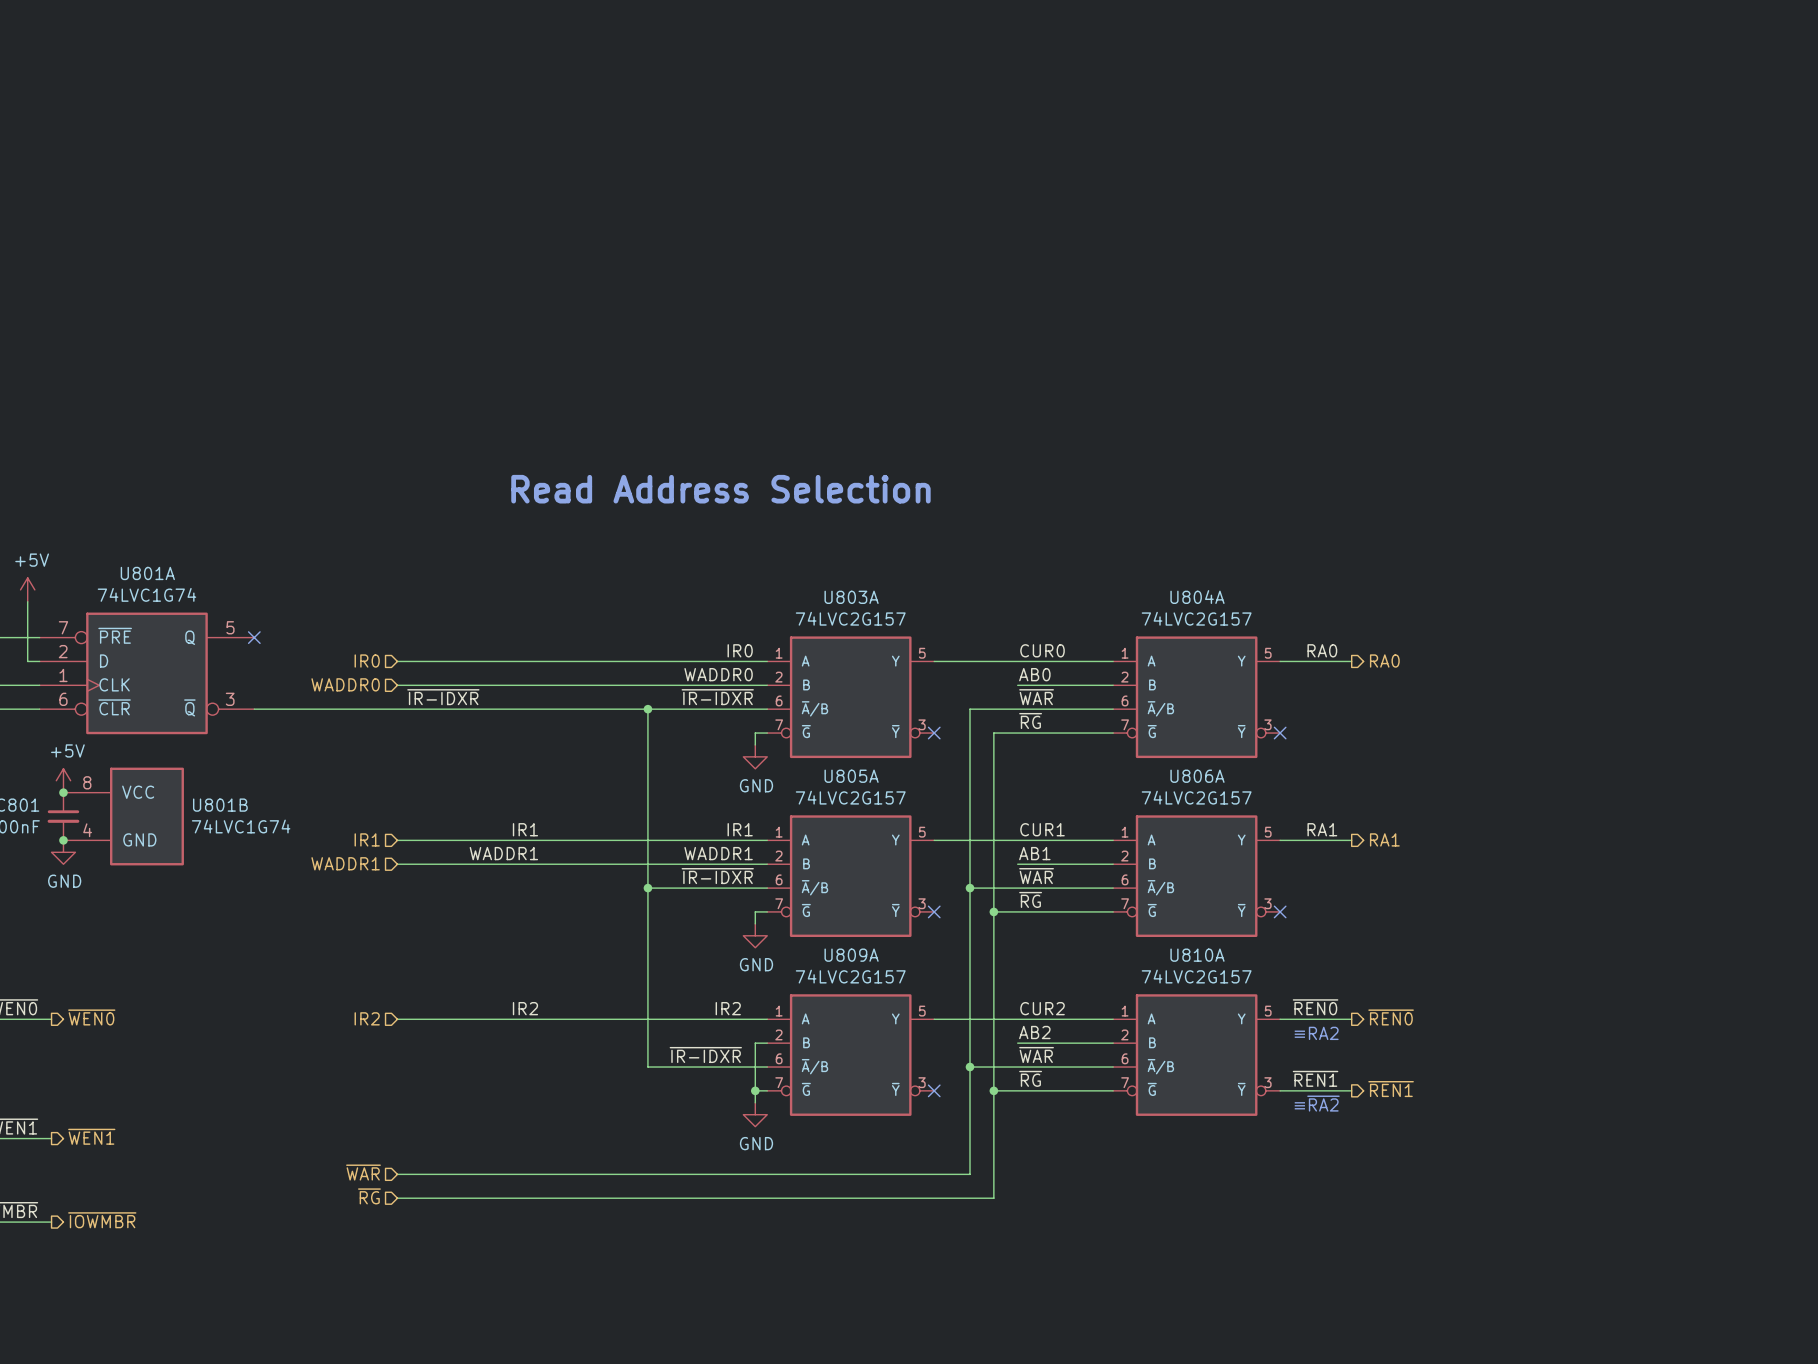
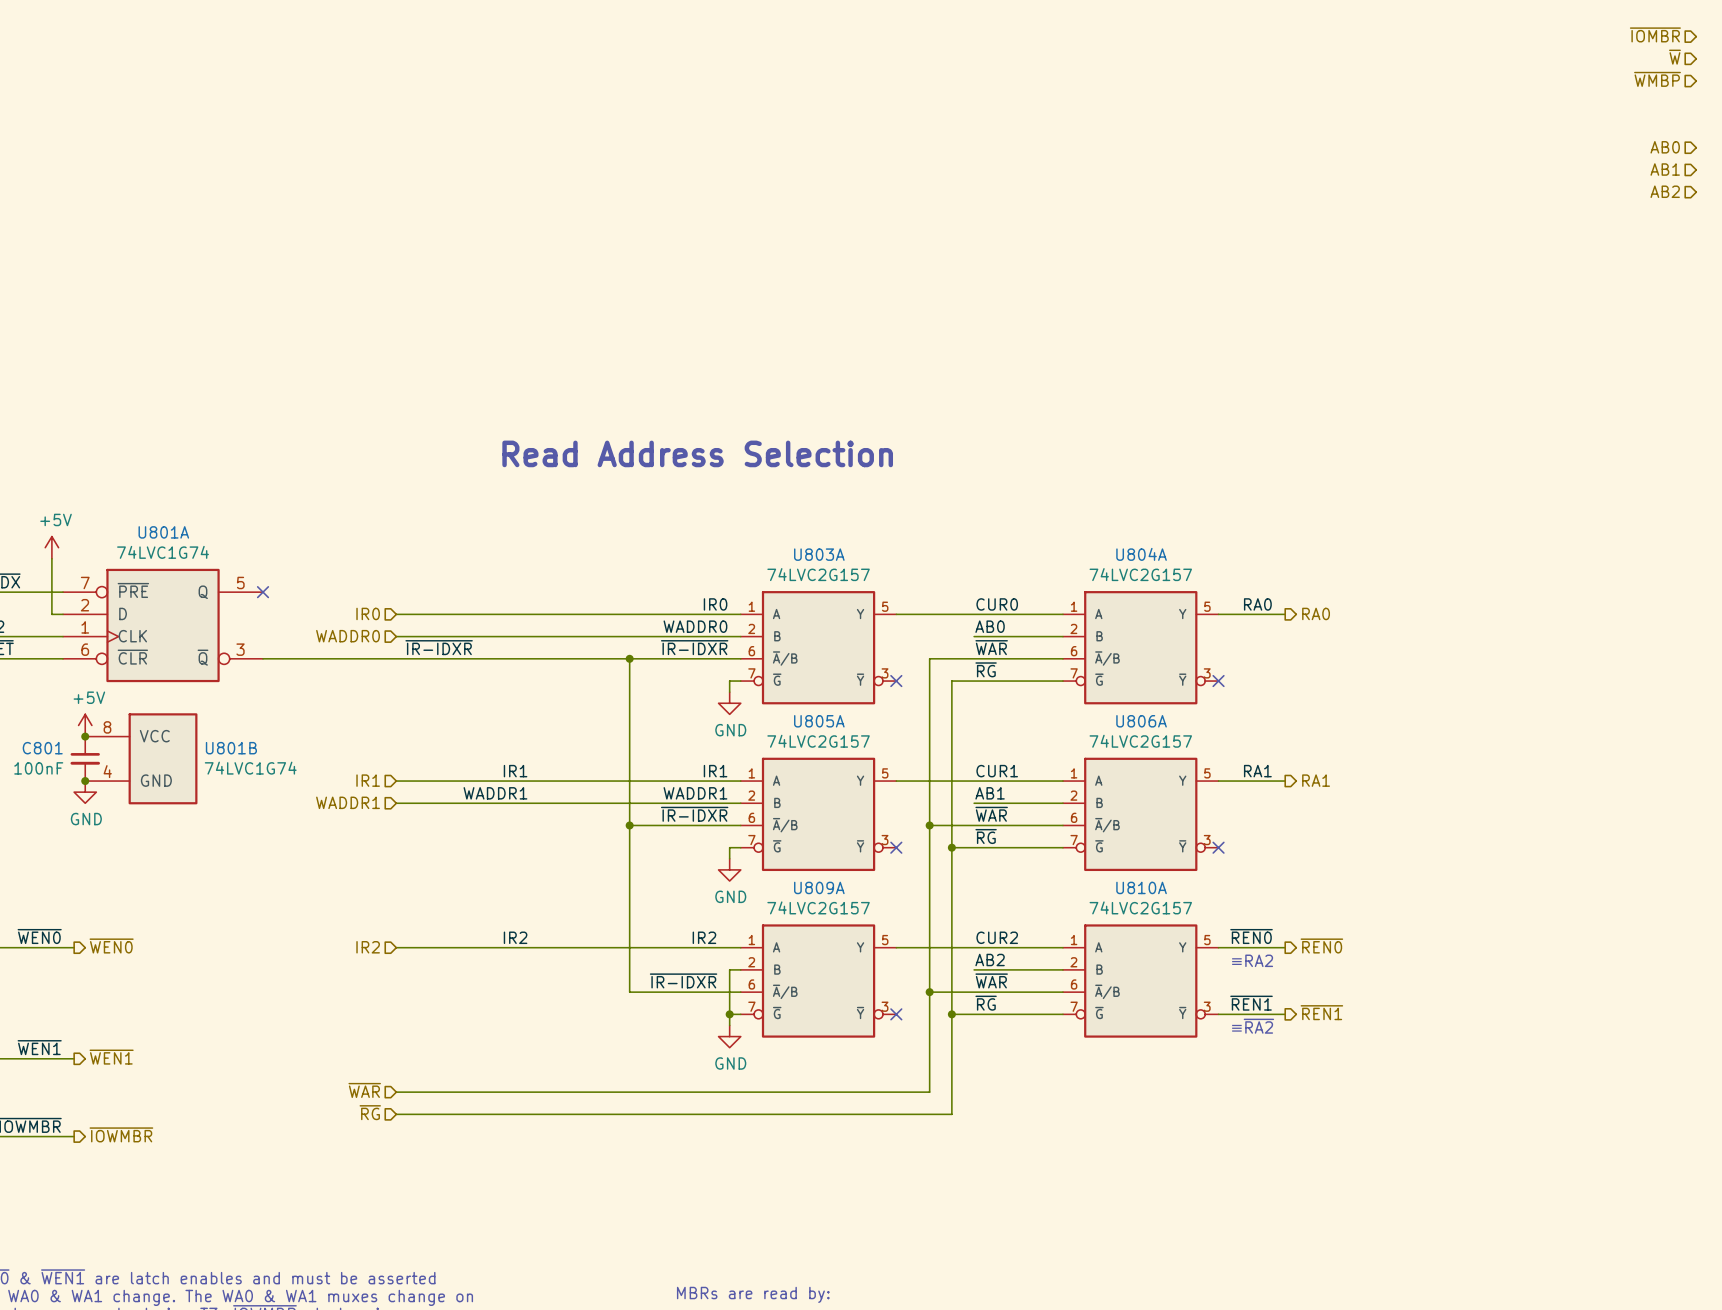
hierarchical label: none -> ~{IOMBR} (1655, 34)
hierarchical label: none -> ~{W} (1674, 57)
hierarchical label: none -> ~{WMBP} (1657, 79)
hierarchical label: none -> AB0 (1665, 147)
hierarchical label: none -> AB1 (1665, 169)
hierarchical label: none -> AB2 (1665, 191)

